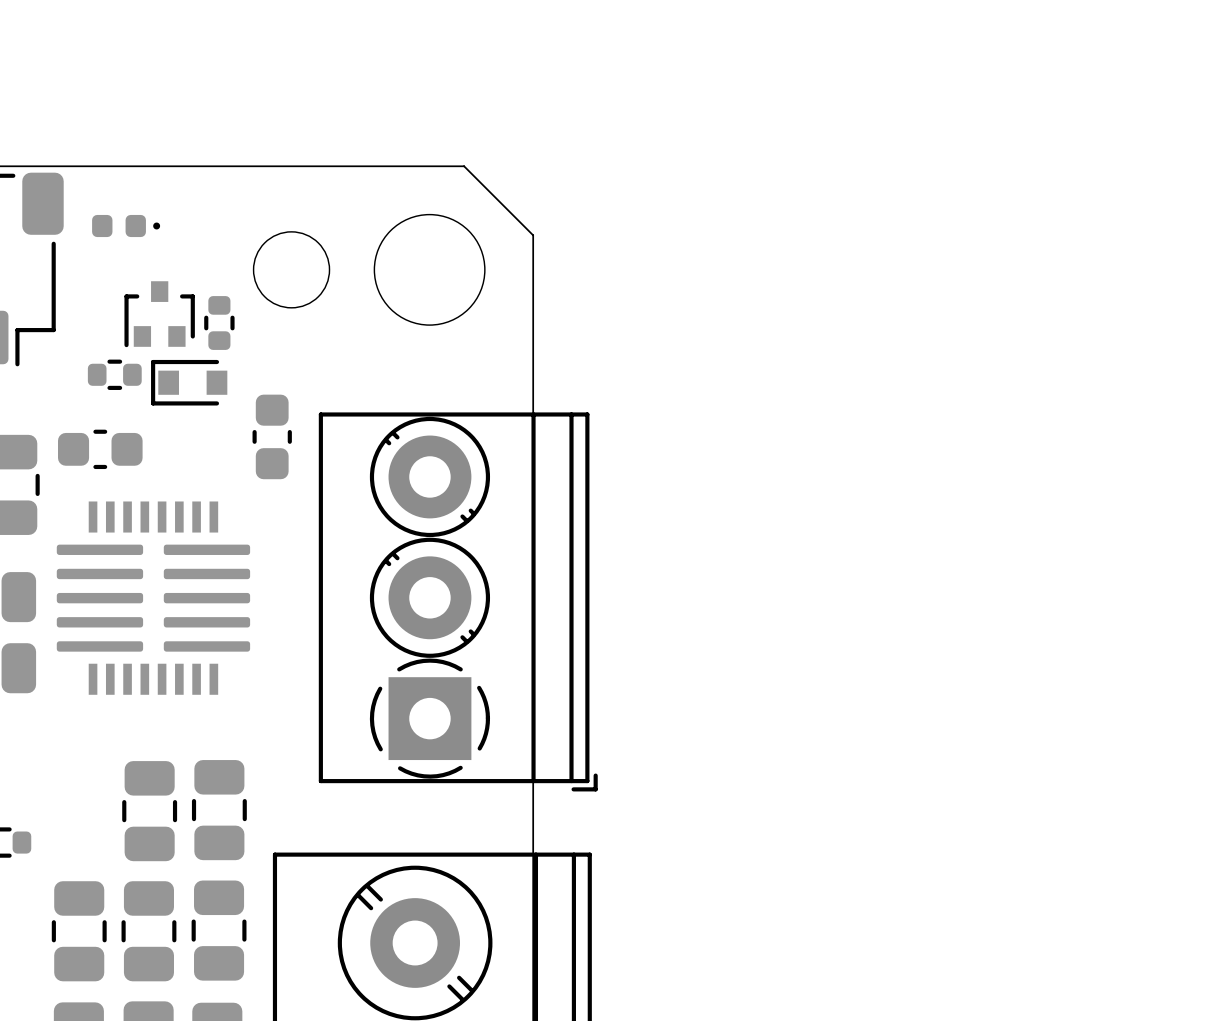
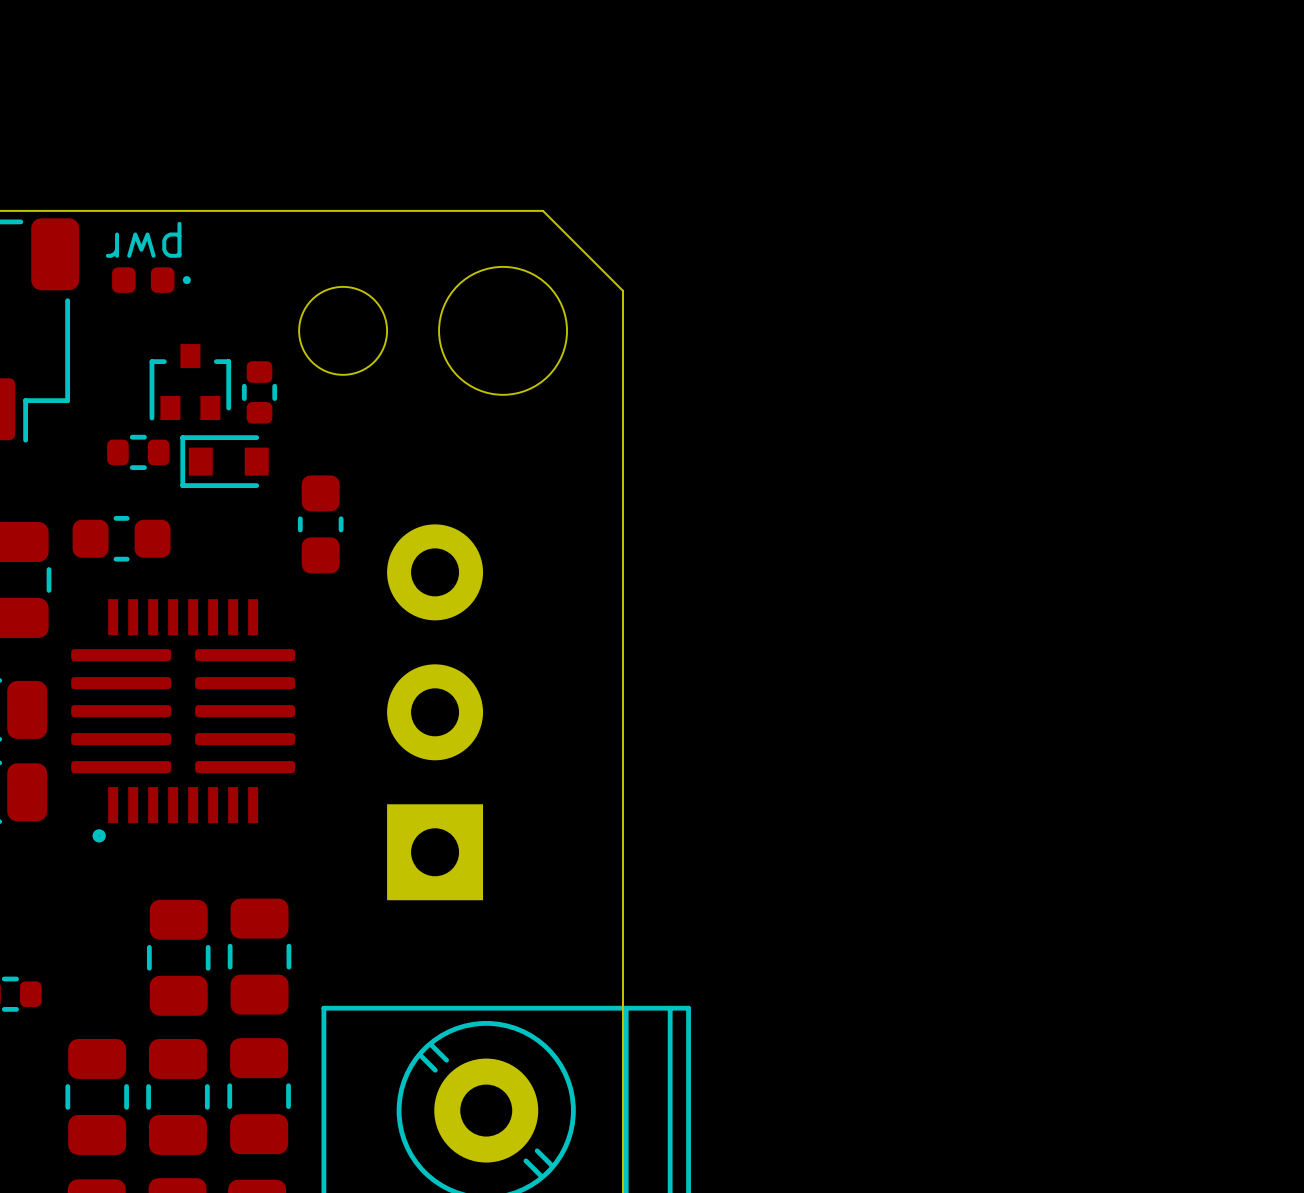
text: none -> pwr (143, 239)
part: none -> (435, 712)
part: (458, 601) -> none
drawing: none -> [92, 829, 106, 843]

